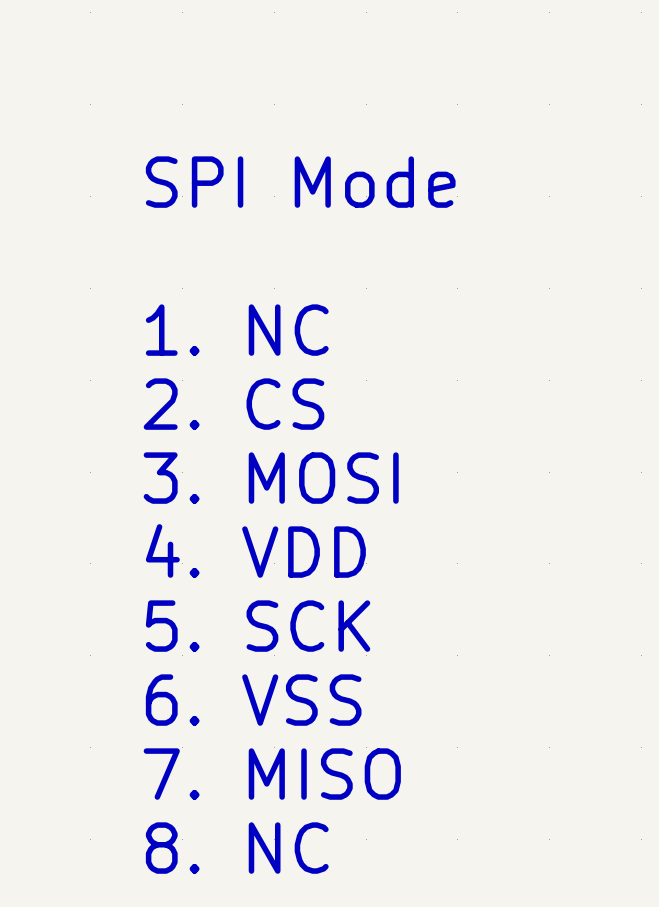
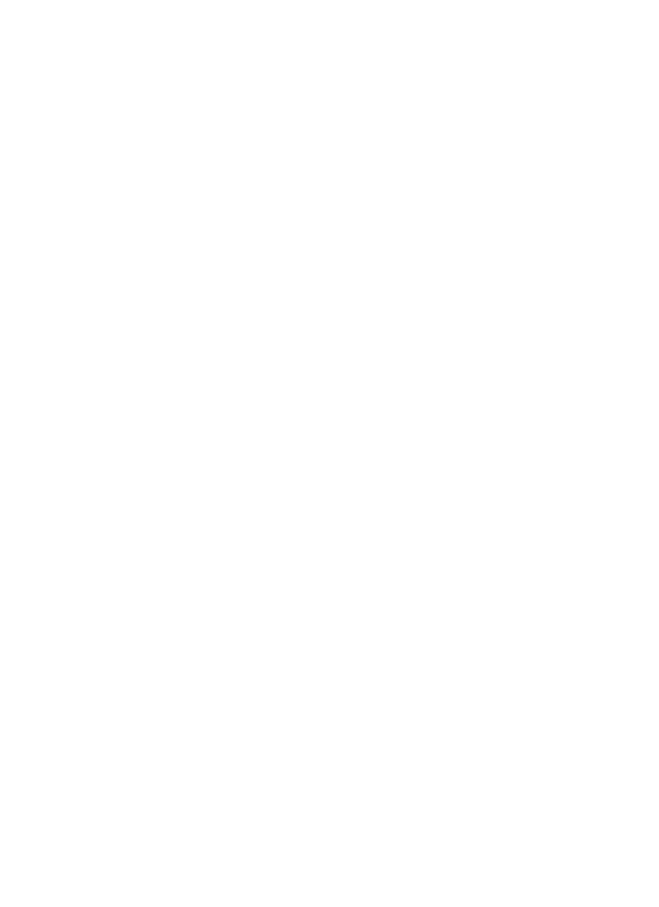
text: SPI Mode (300, 182) -> none
text: 1. NC (237, 330) -> none
text: 2. CS (233, 404) -> none
text: 3. MOSI (271, 478) -> none
text: 4. VDD (255, 550) -> none
text: 5. SCK (258, 626) -> none
text: 6. VSS (253, 700) -> none
text: 7. MISO (272, 774) -> none
text: 8. NC (237, 848) -> none

